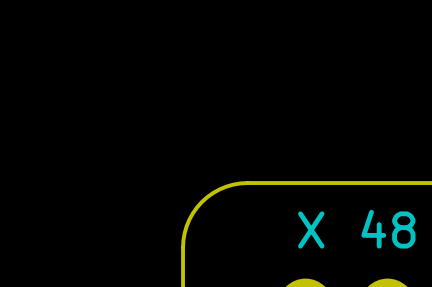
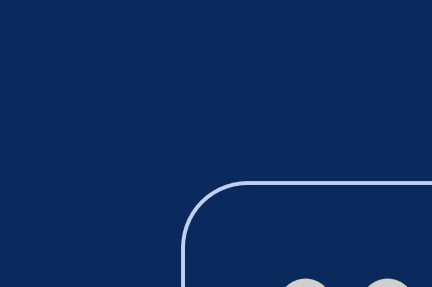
text: X (311, 229) -> none
text: 48 (388, 229) -> none

